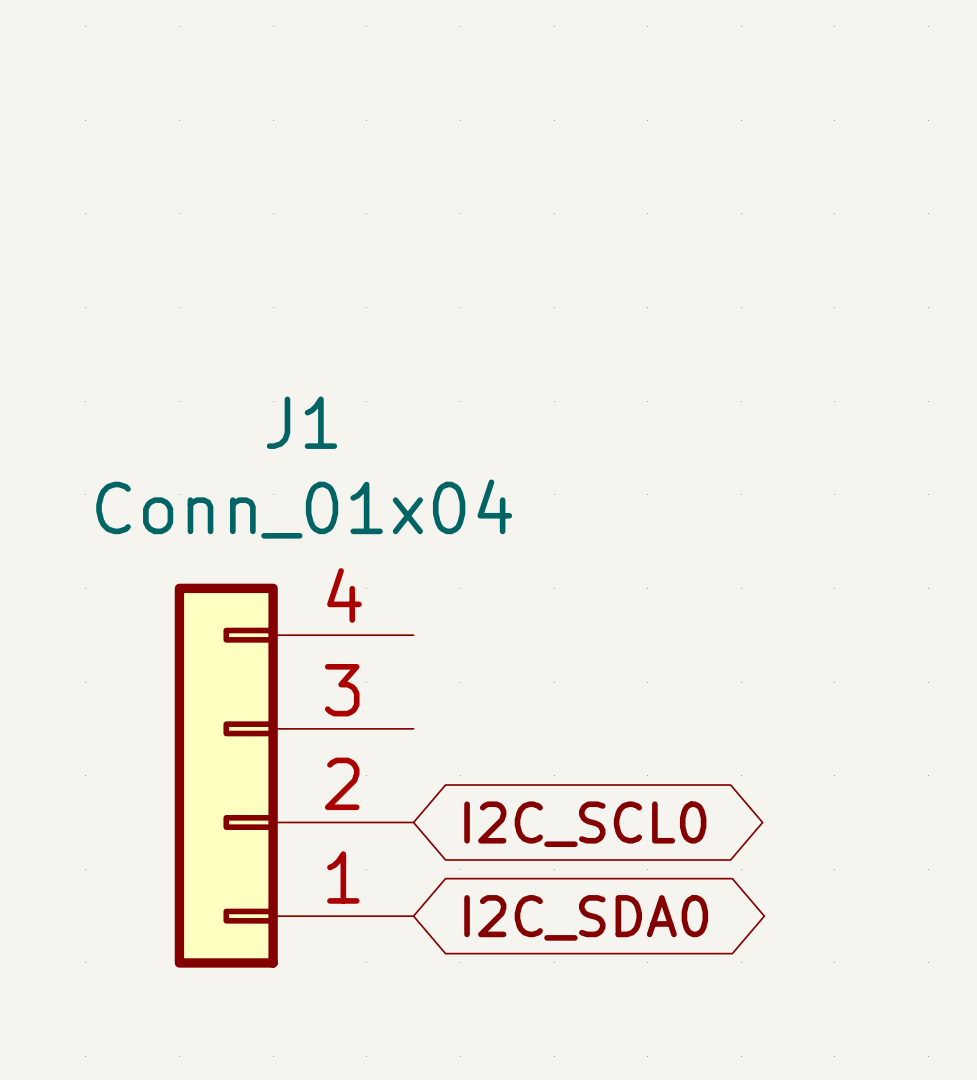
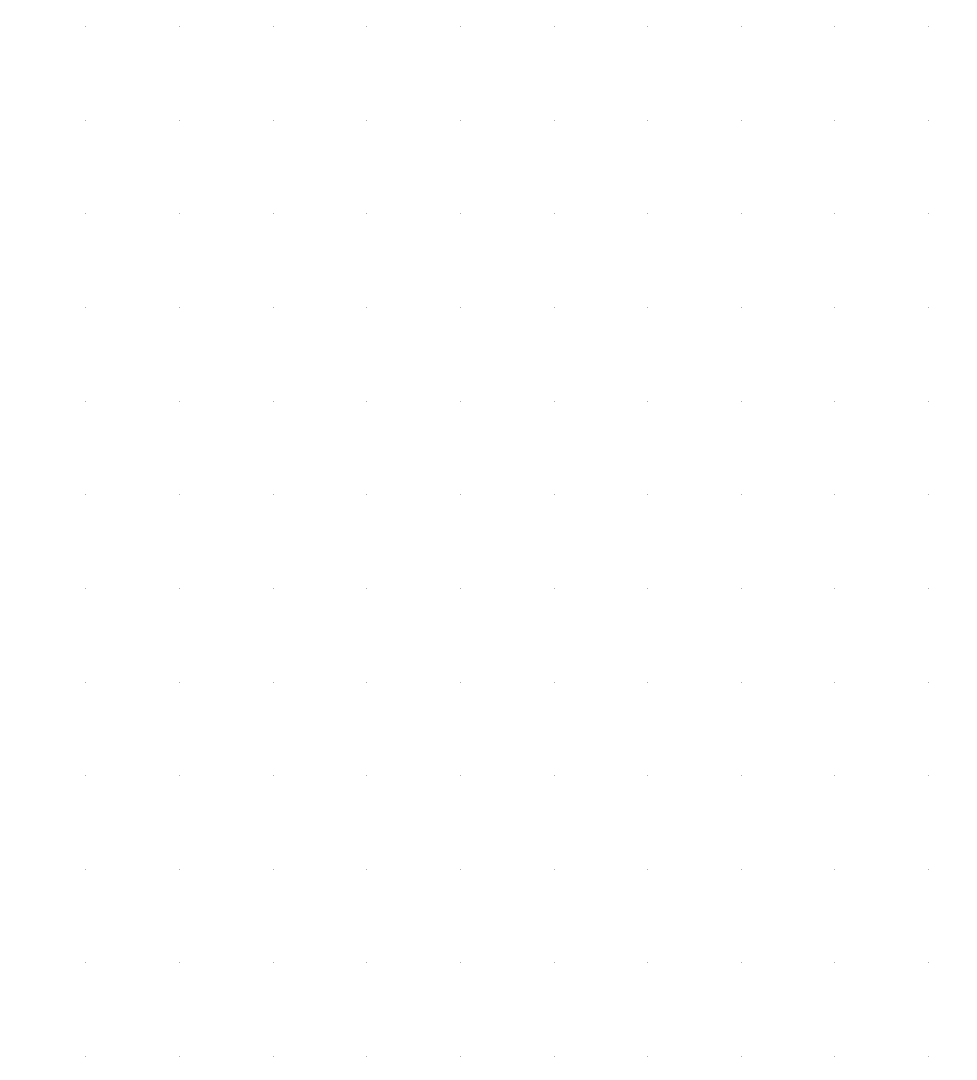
J1: Conn_01x04 (294, 775) -> none
global label: I2C_SCL0 (585, 824) -> none
global label: I2C_SDA0 (586, 917) -> none

